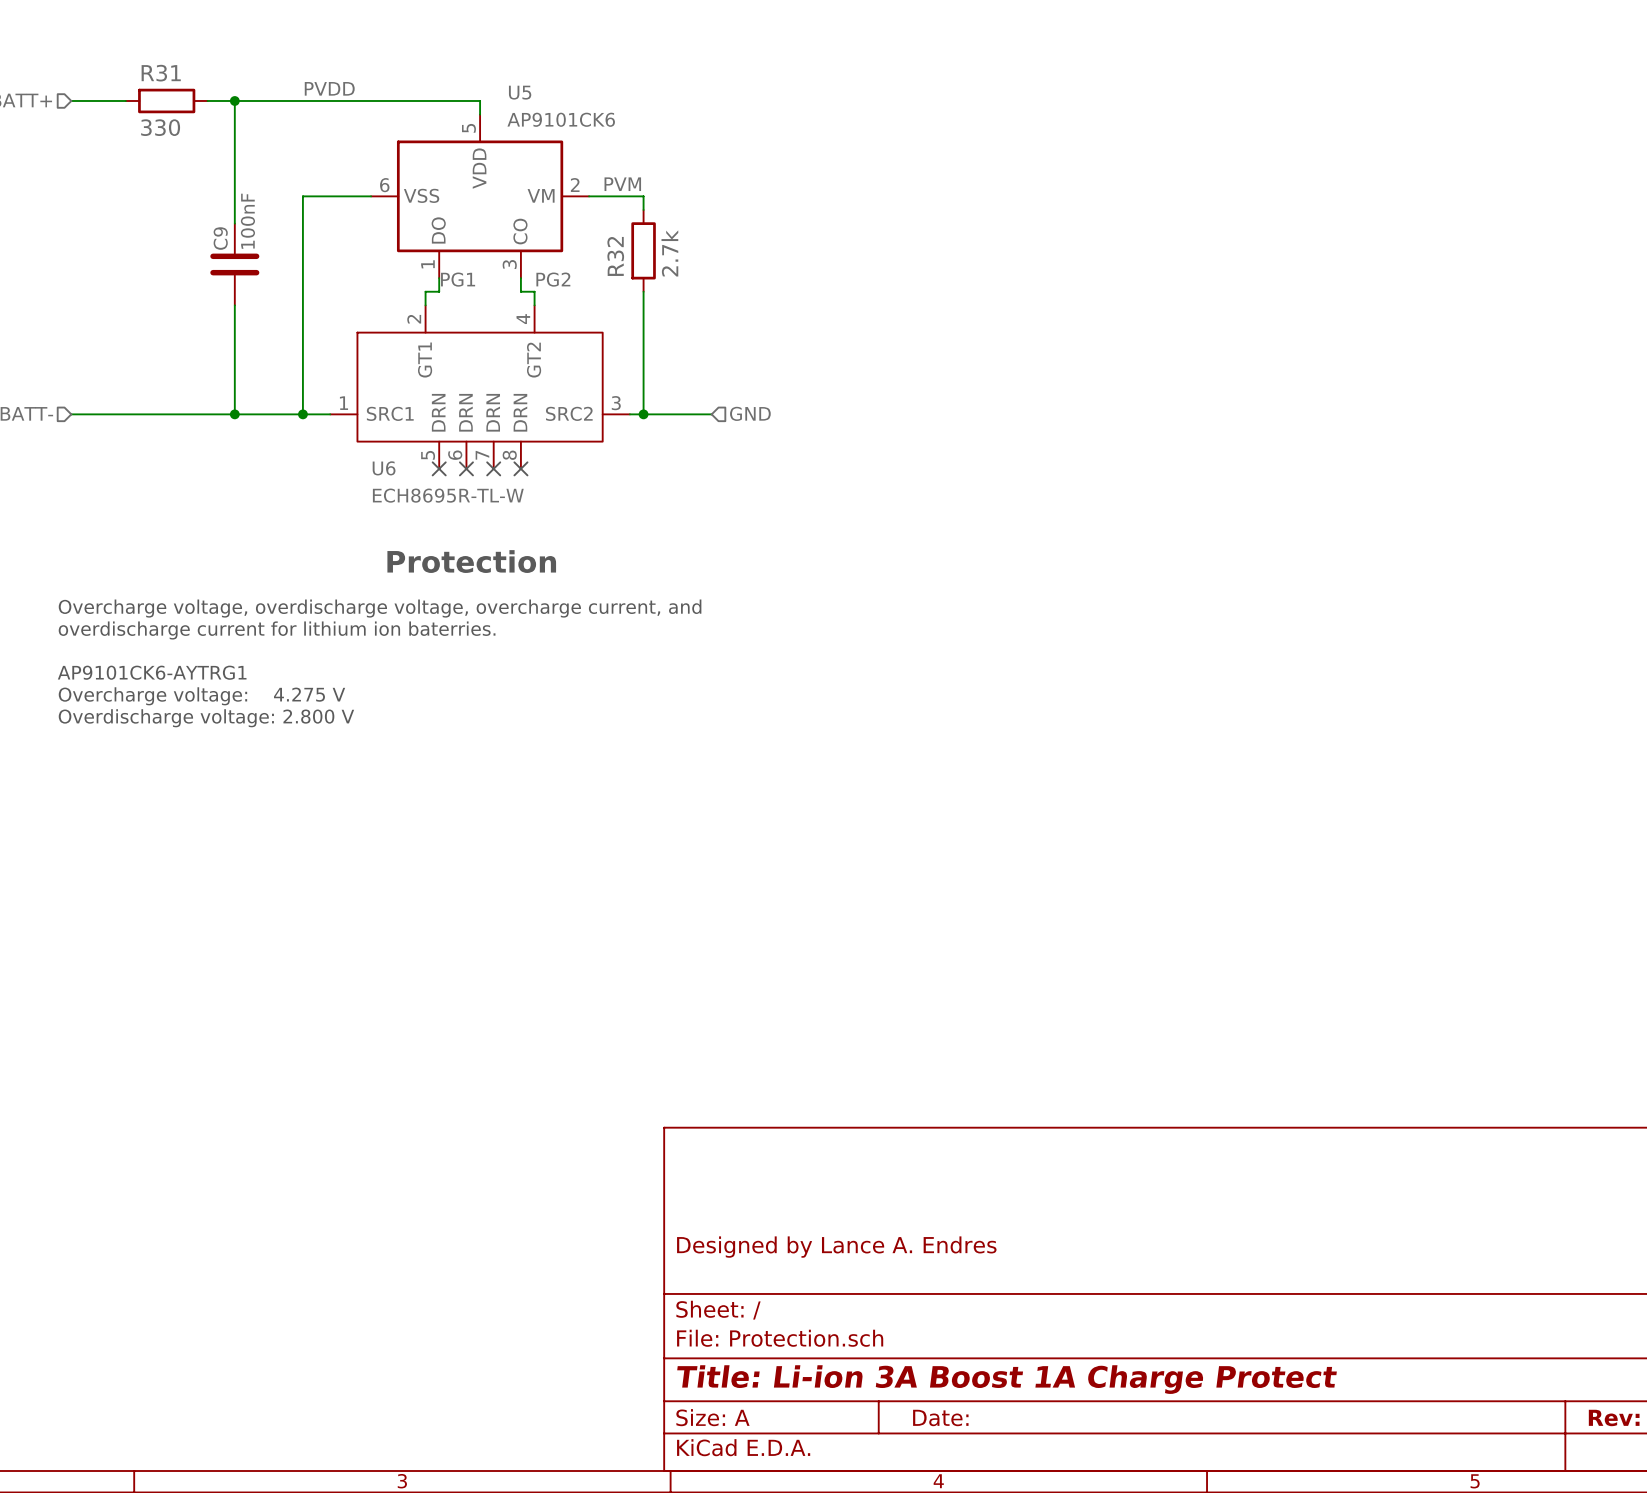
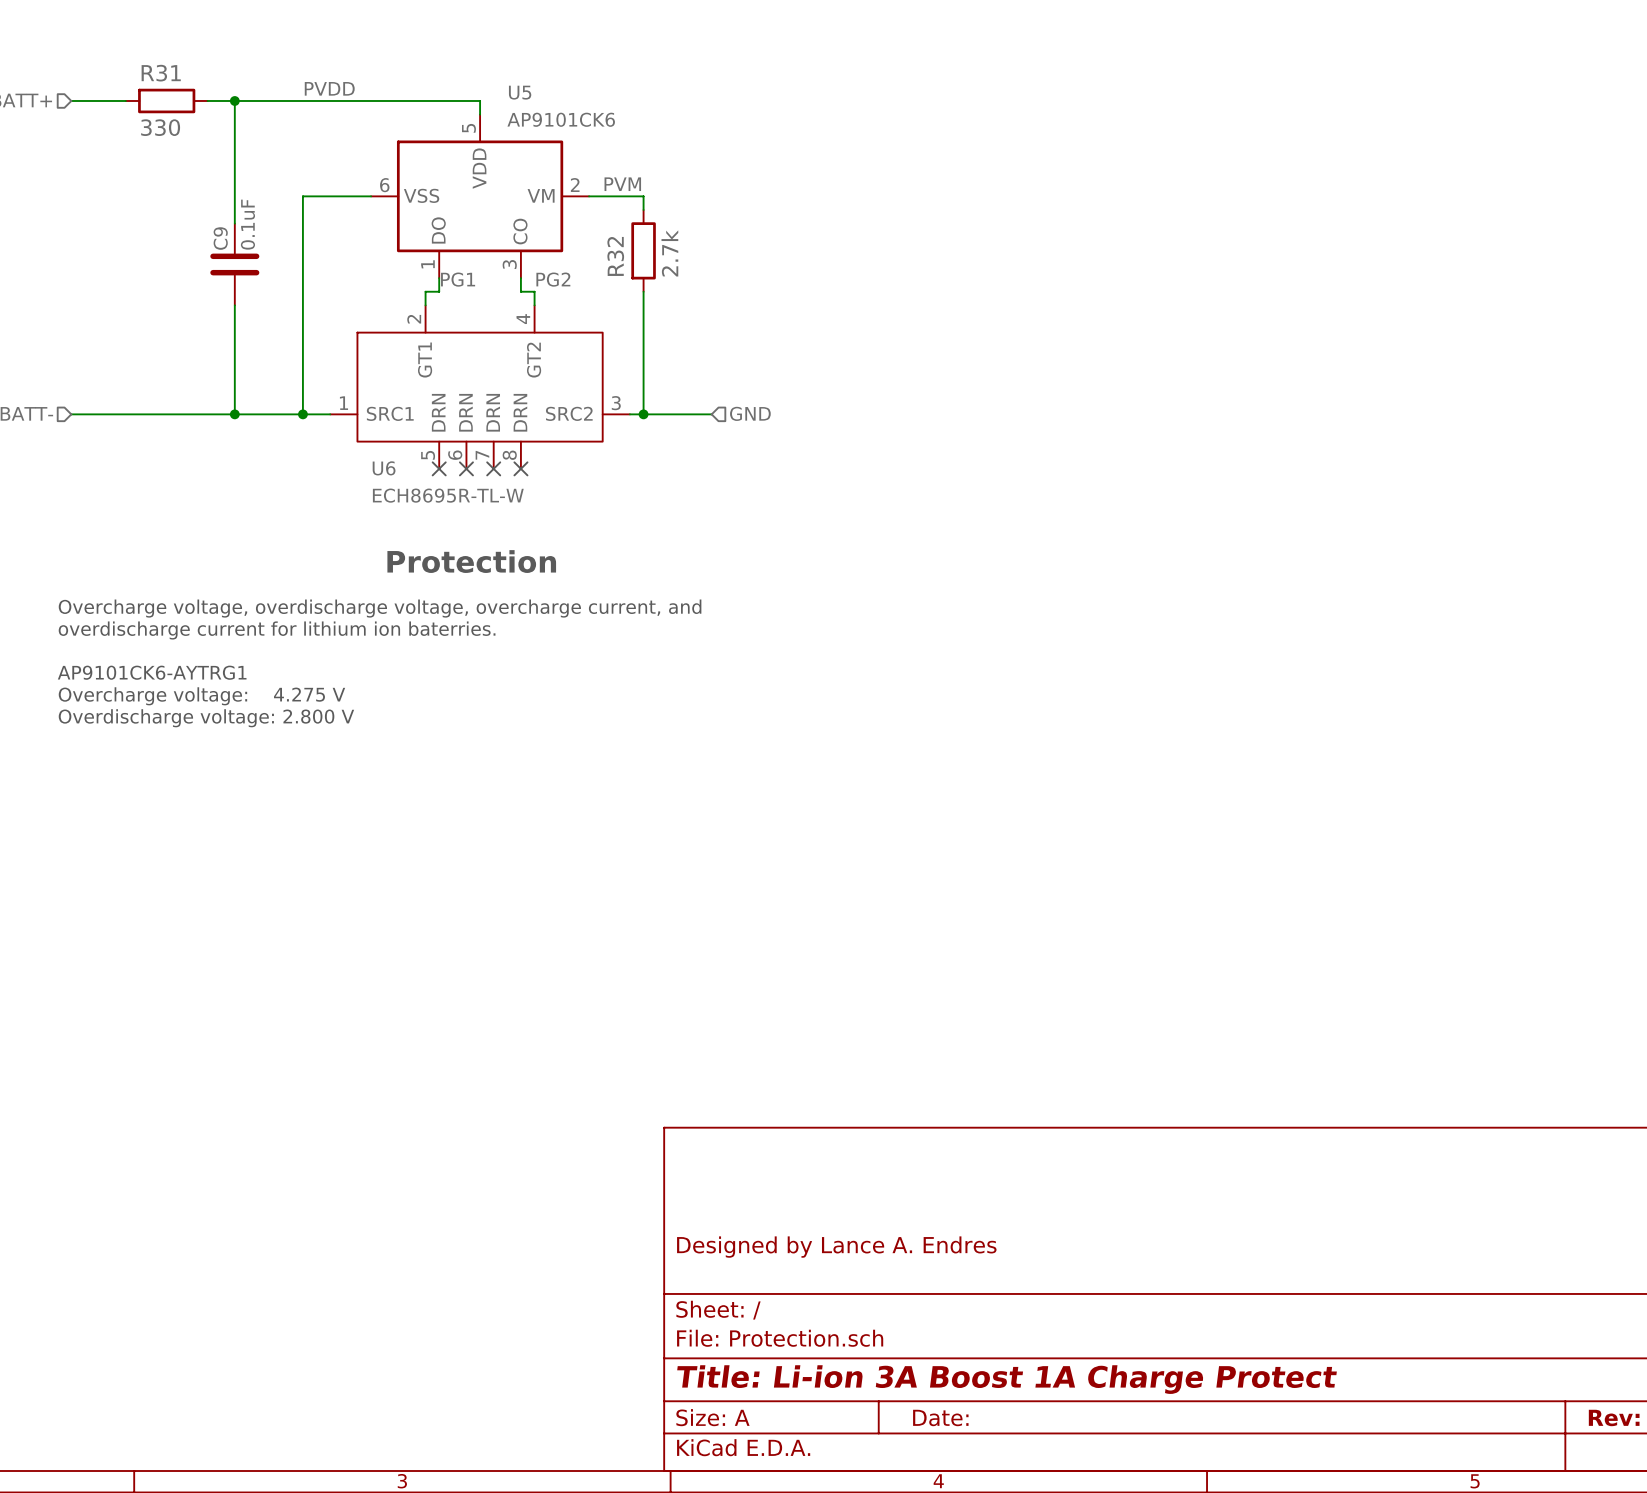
C9 value: 100nF (247, 221) -> 0.1uF (247, 224)

